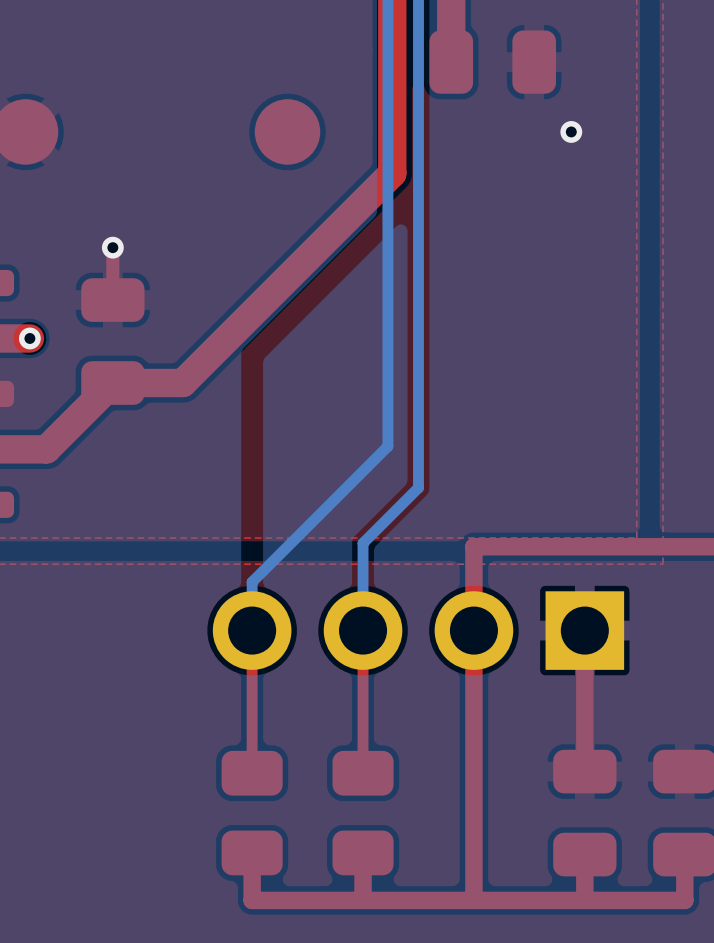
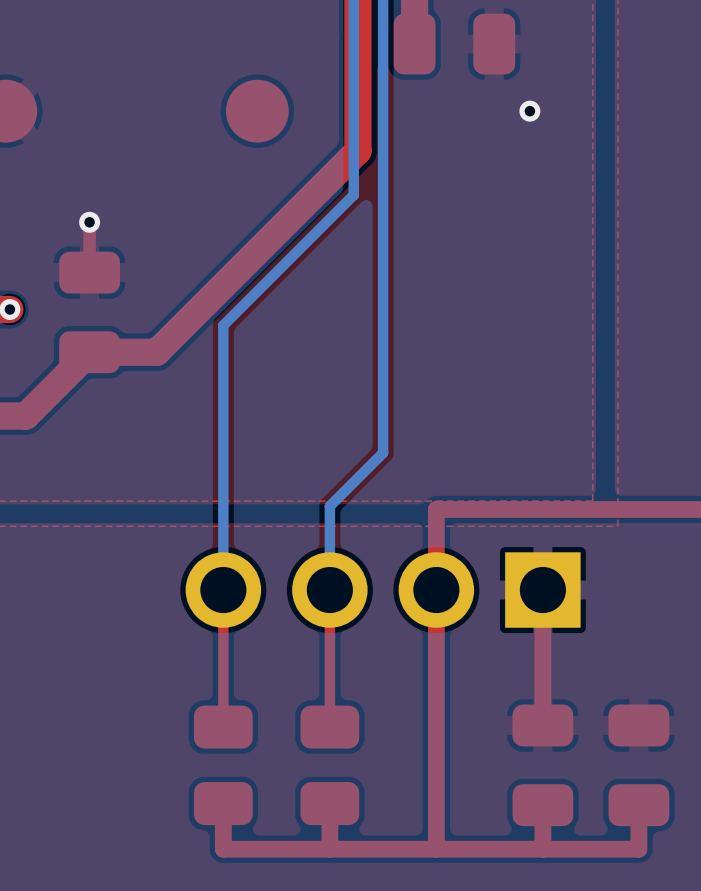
bottom track: (387, 219) (387, 446) (252, 582) -> (353, 195) (223, 325) (223, 543)

